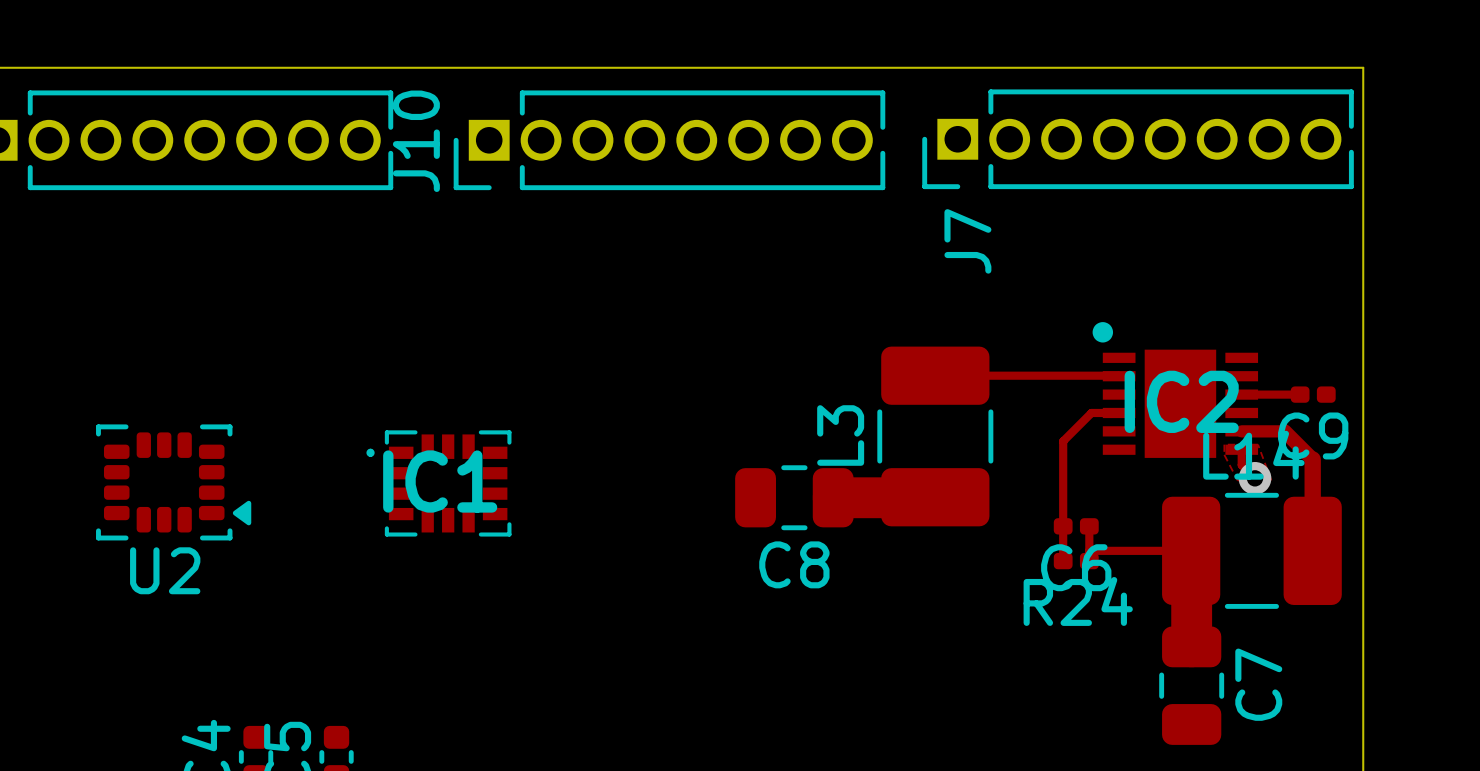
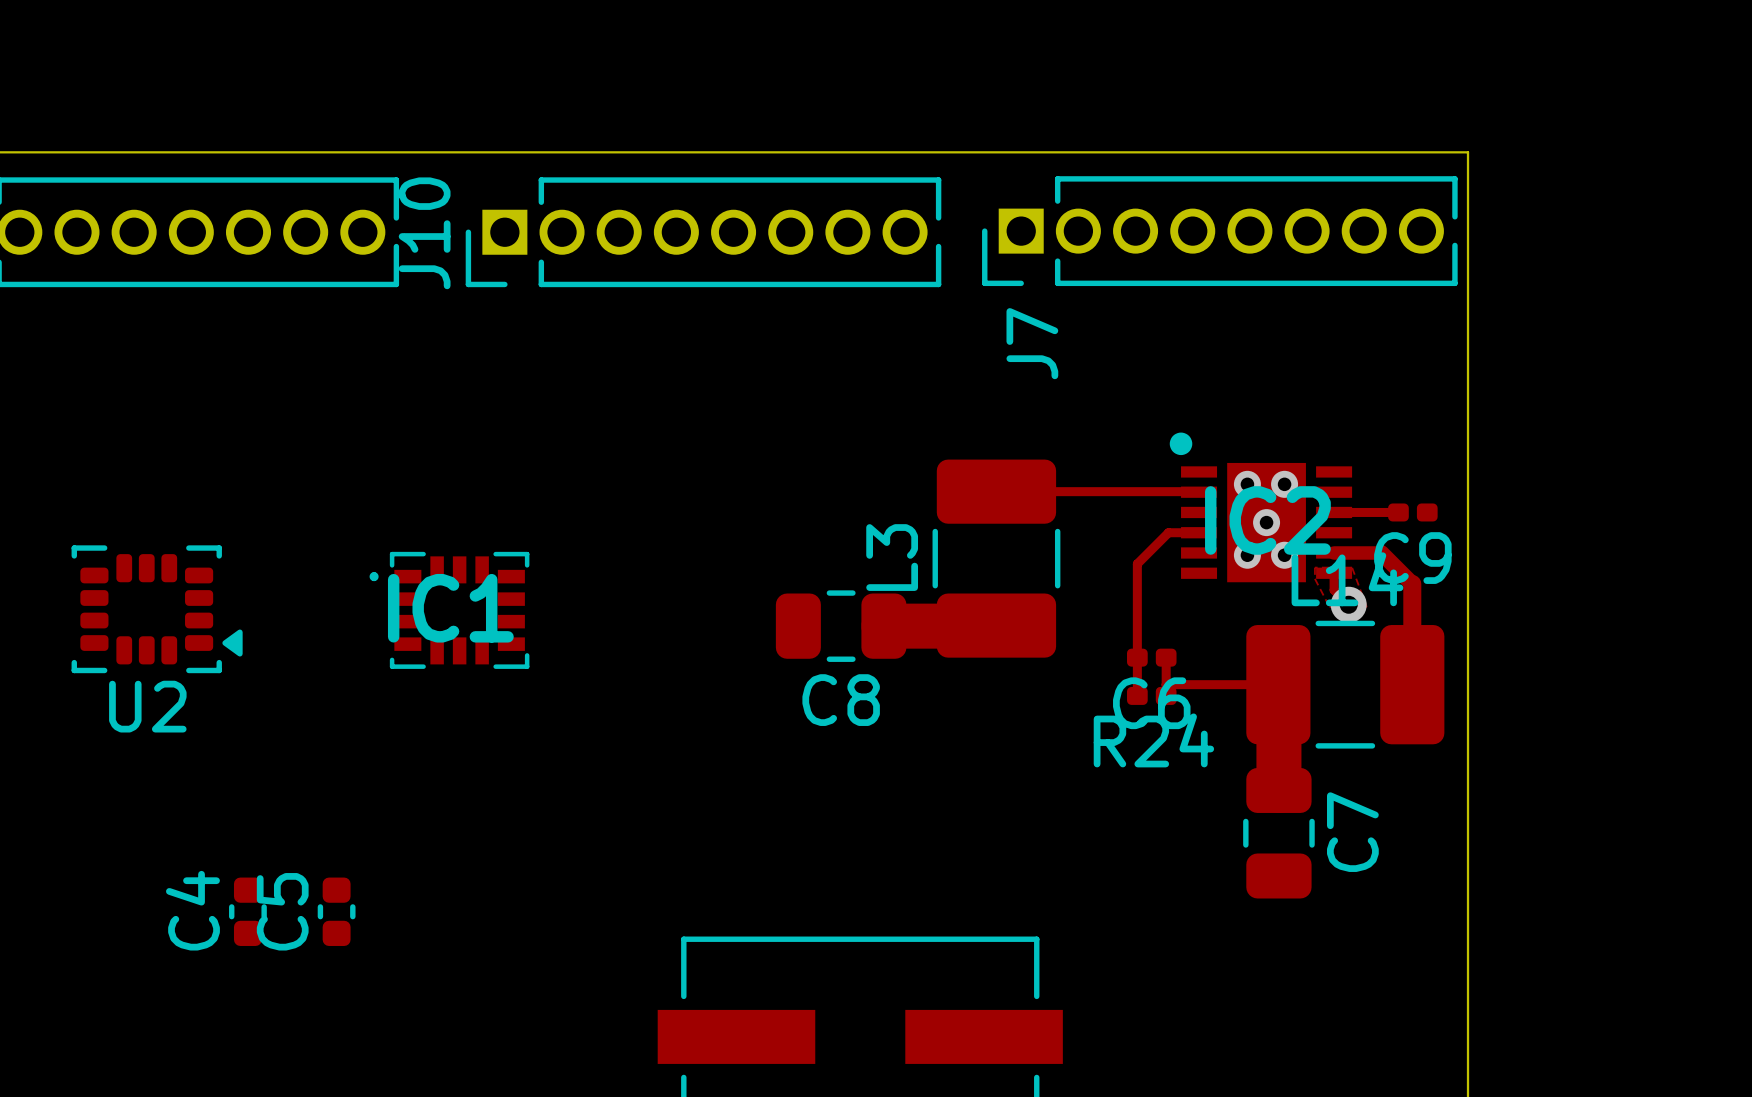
via: none -> (1247, 484)
via: none -> (1284, 484)
via: none -> (1266, 522)
via: none -> (1247, 555)
via: none -> (1284, 555)

